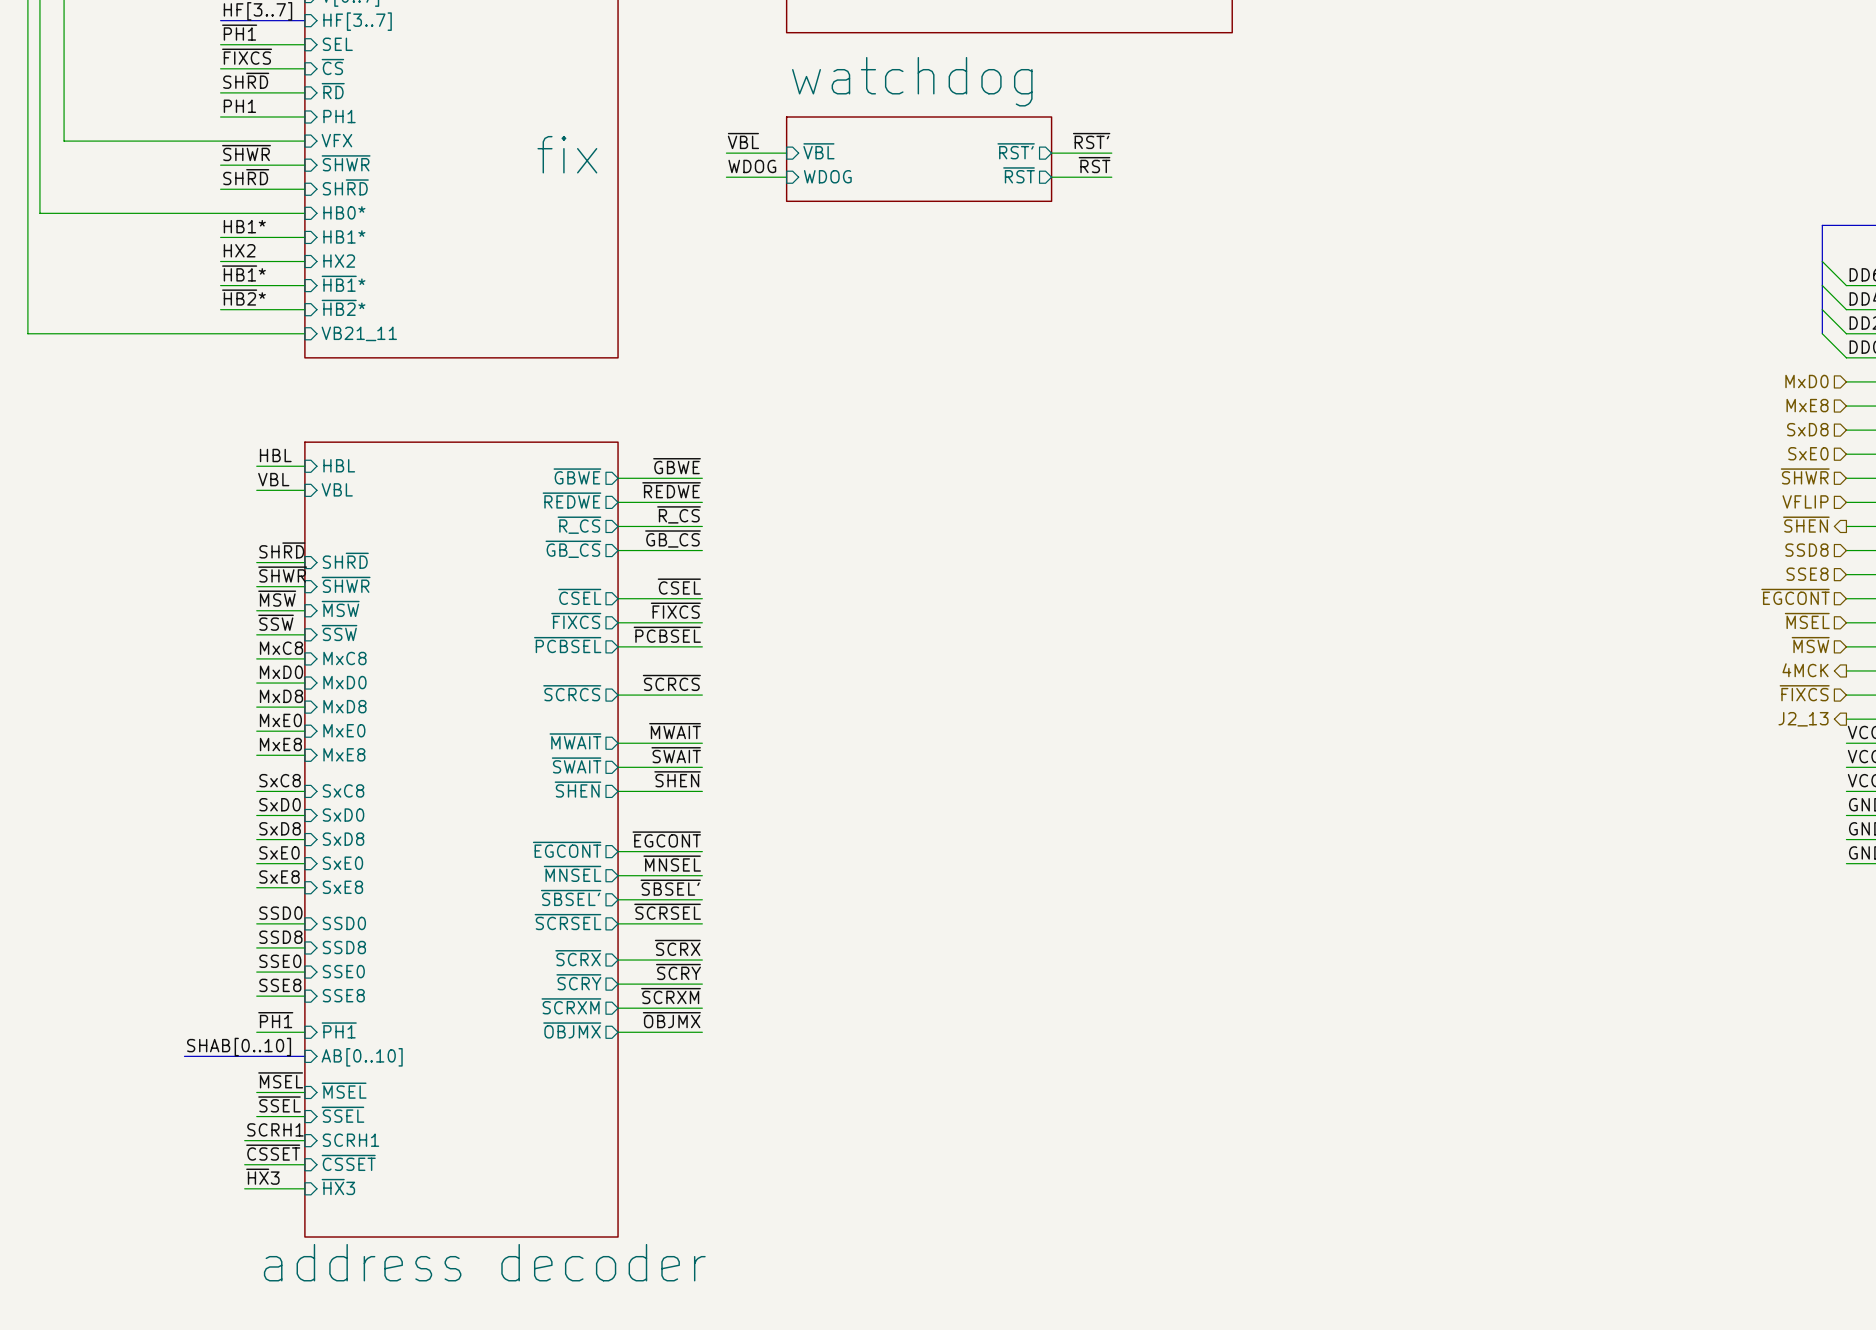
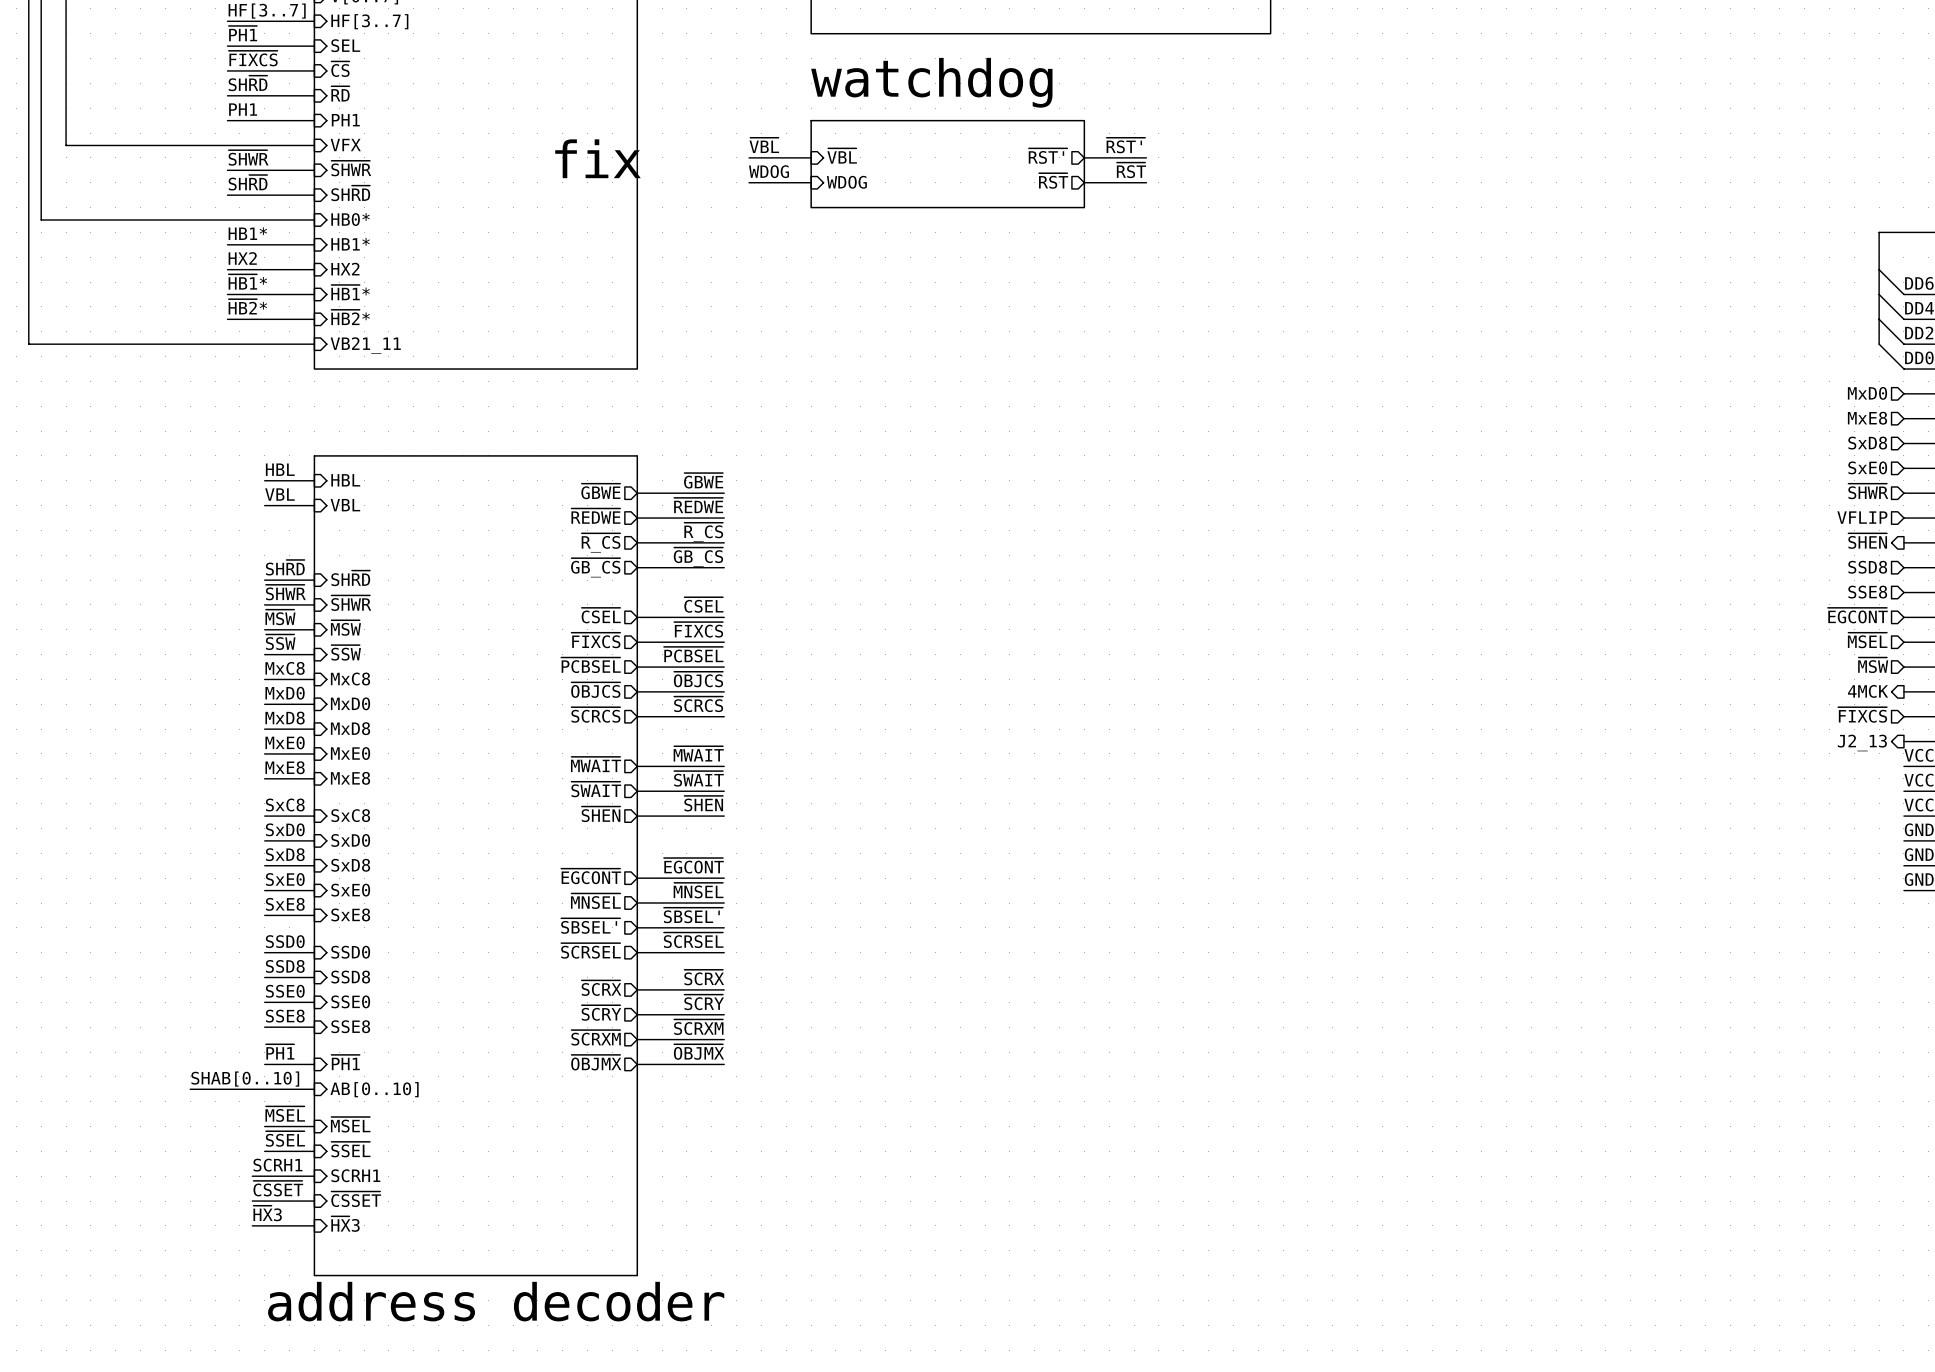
label: none -> ~{OBJCS} (698, 679)
sheet pin: none -> ~{OBJCS} (595, 690)
wire: none -> (637, 691) (724, 691)

